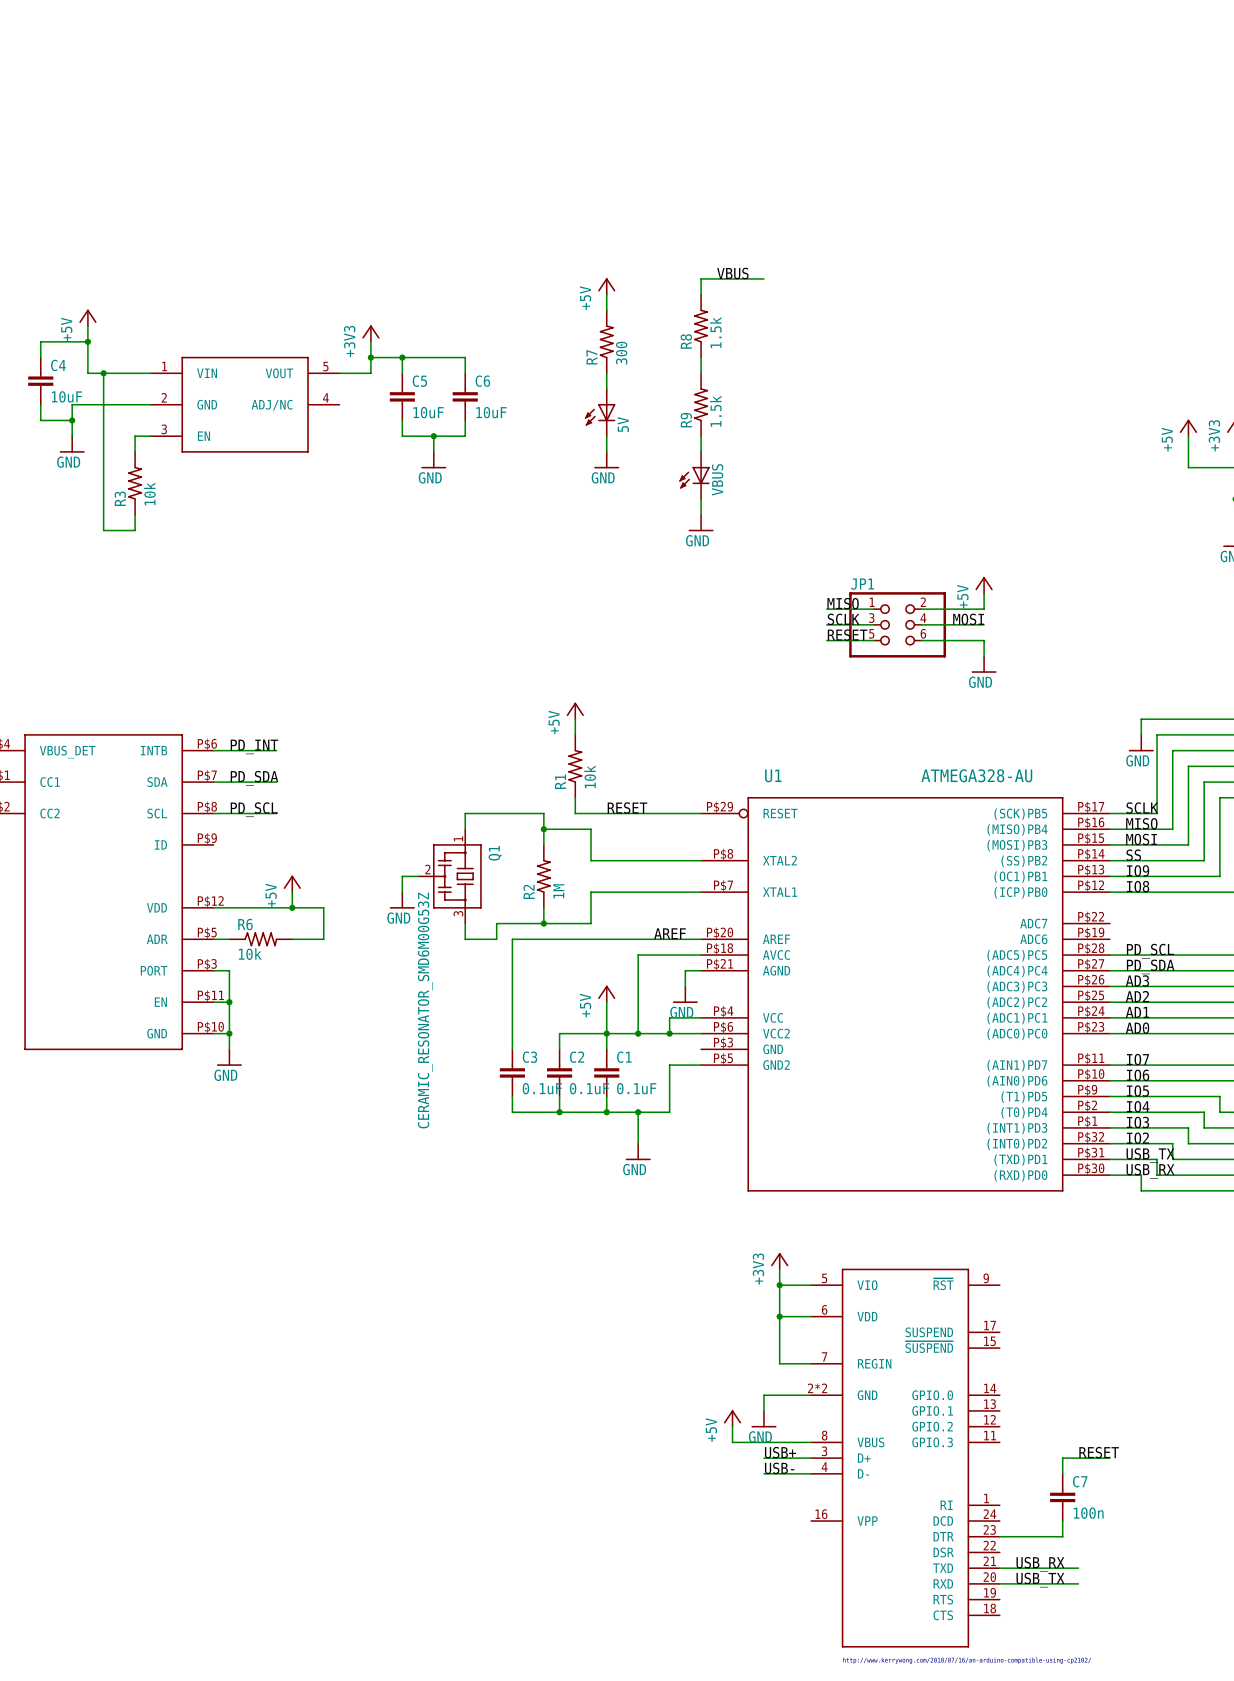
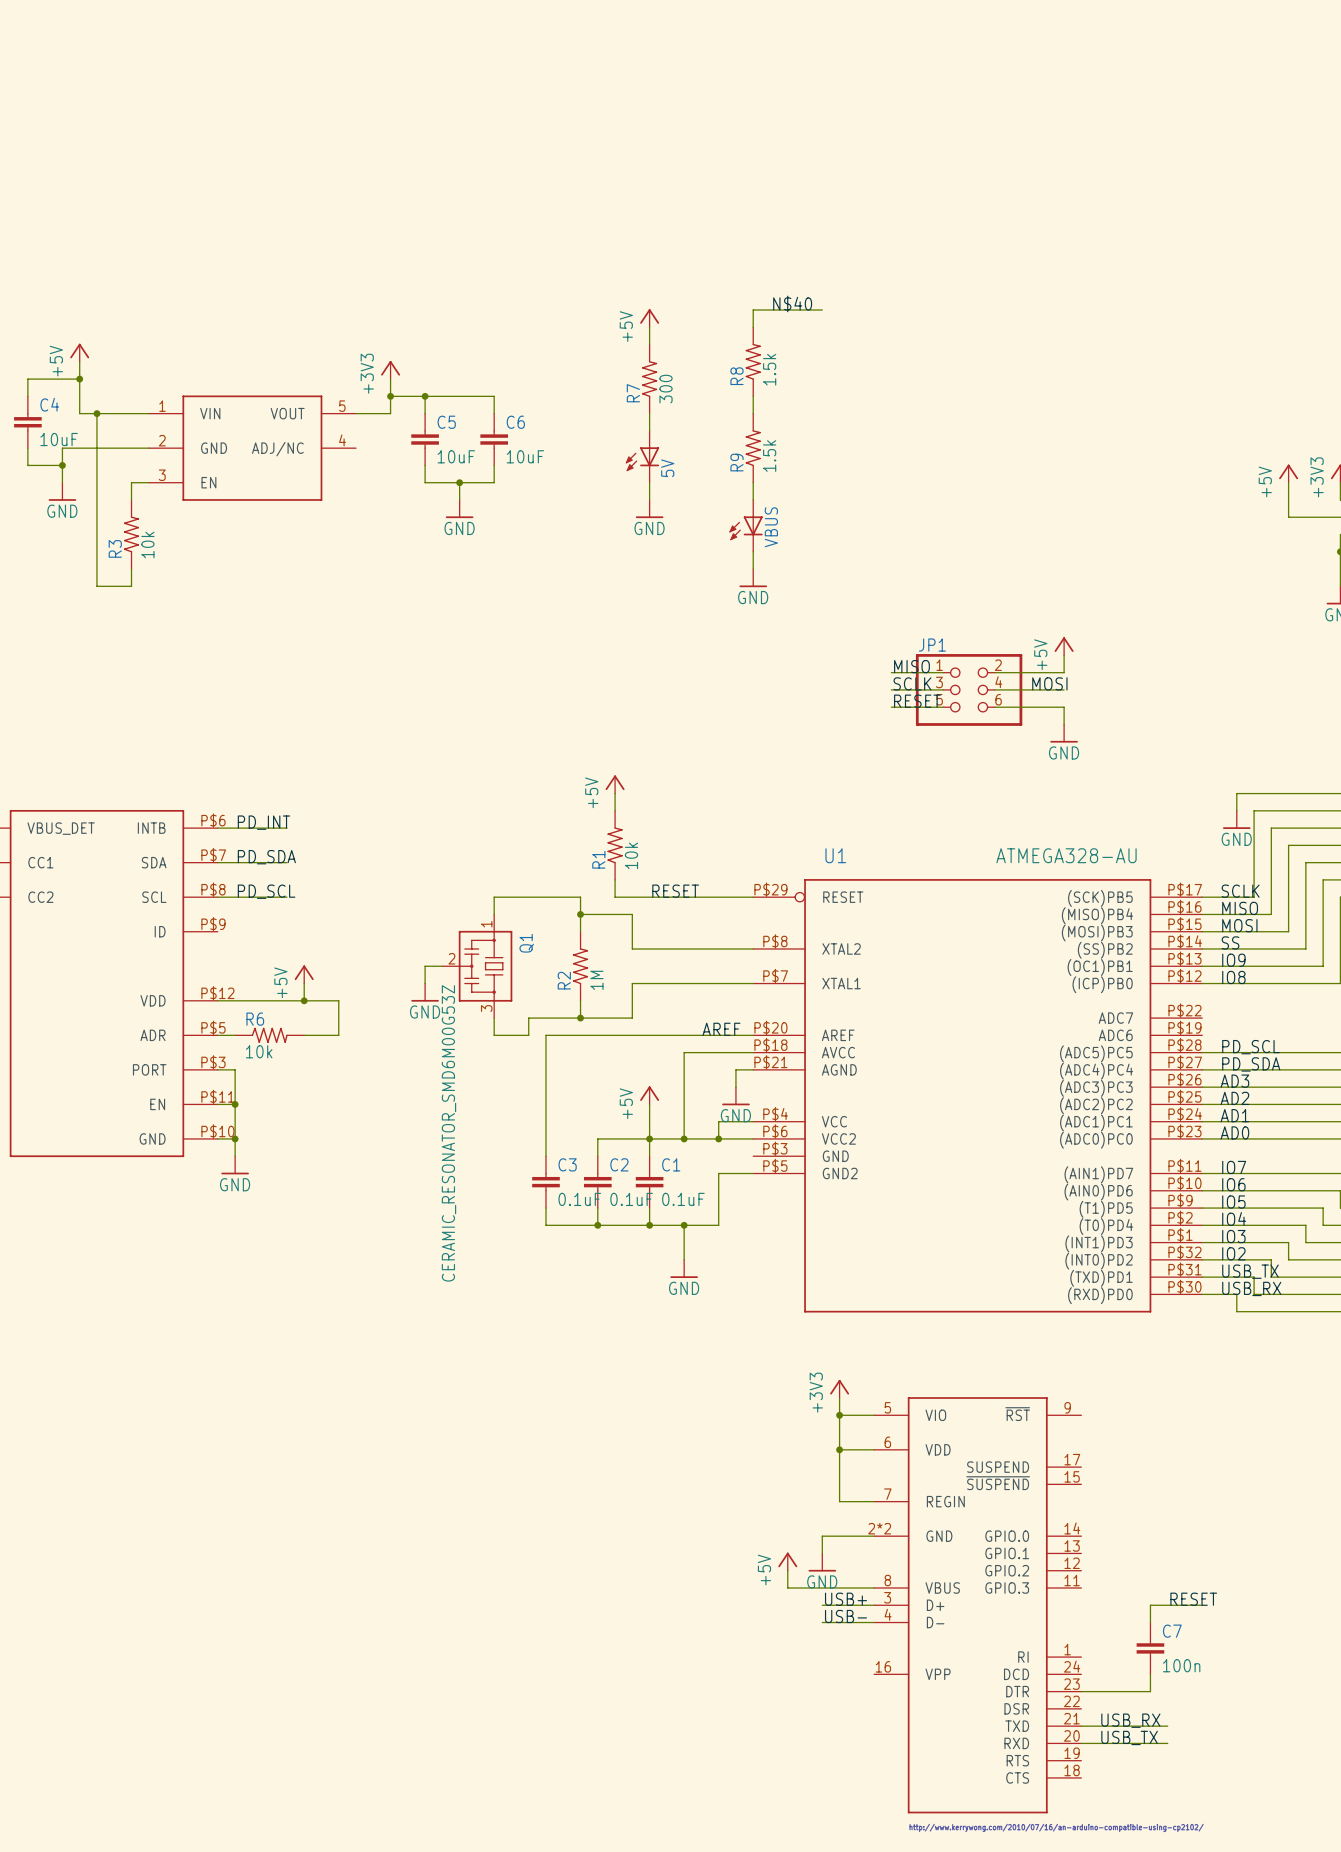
label: VBUS (732, 273) -> N$40 (792, 303)

